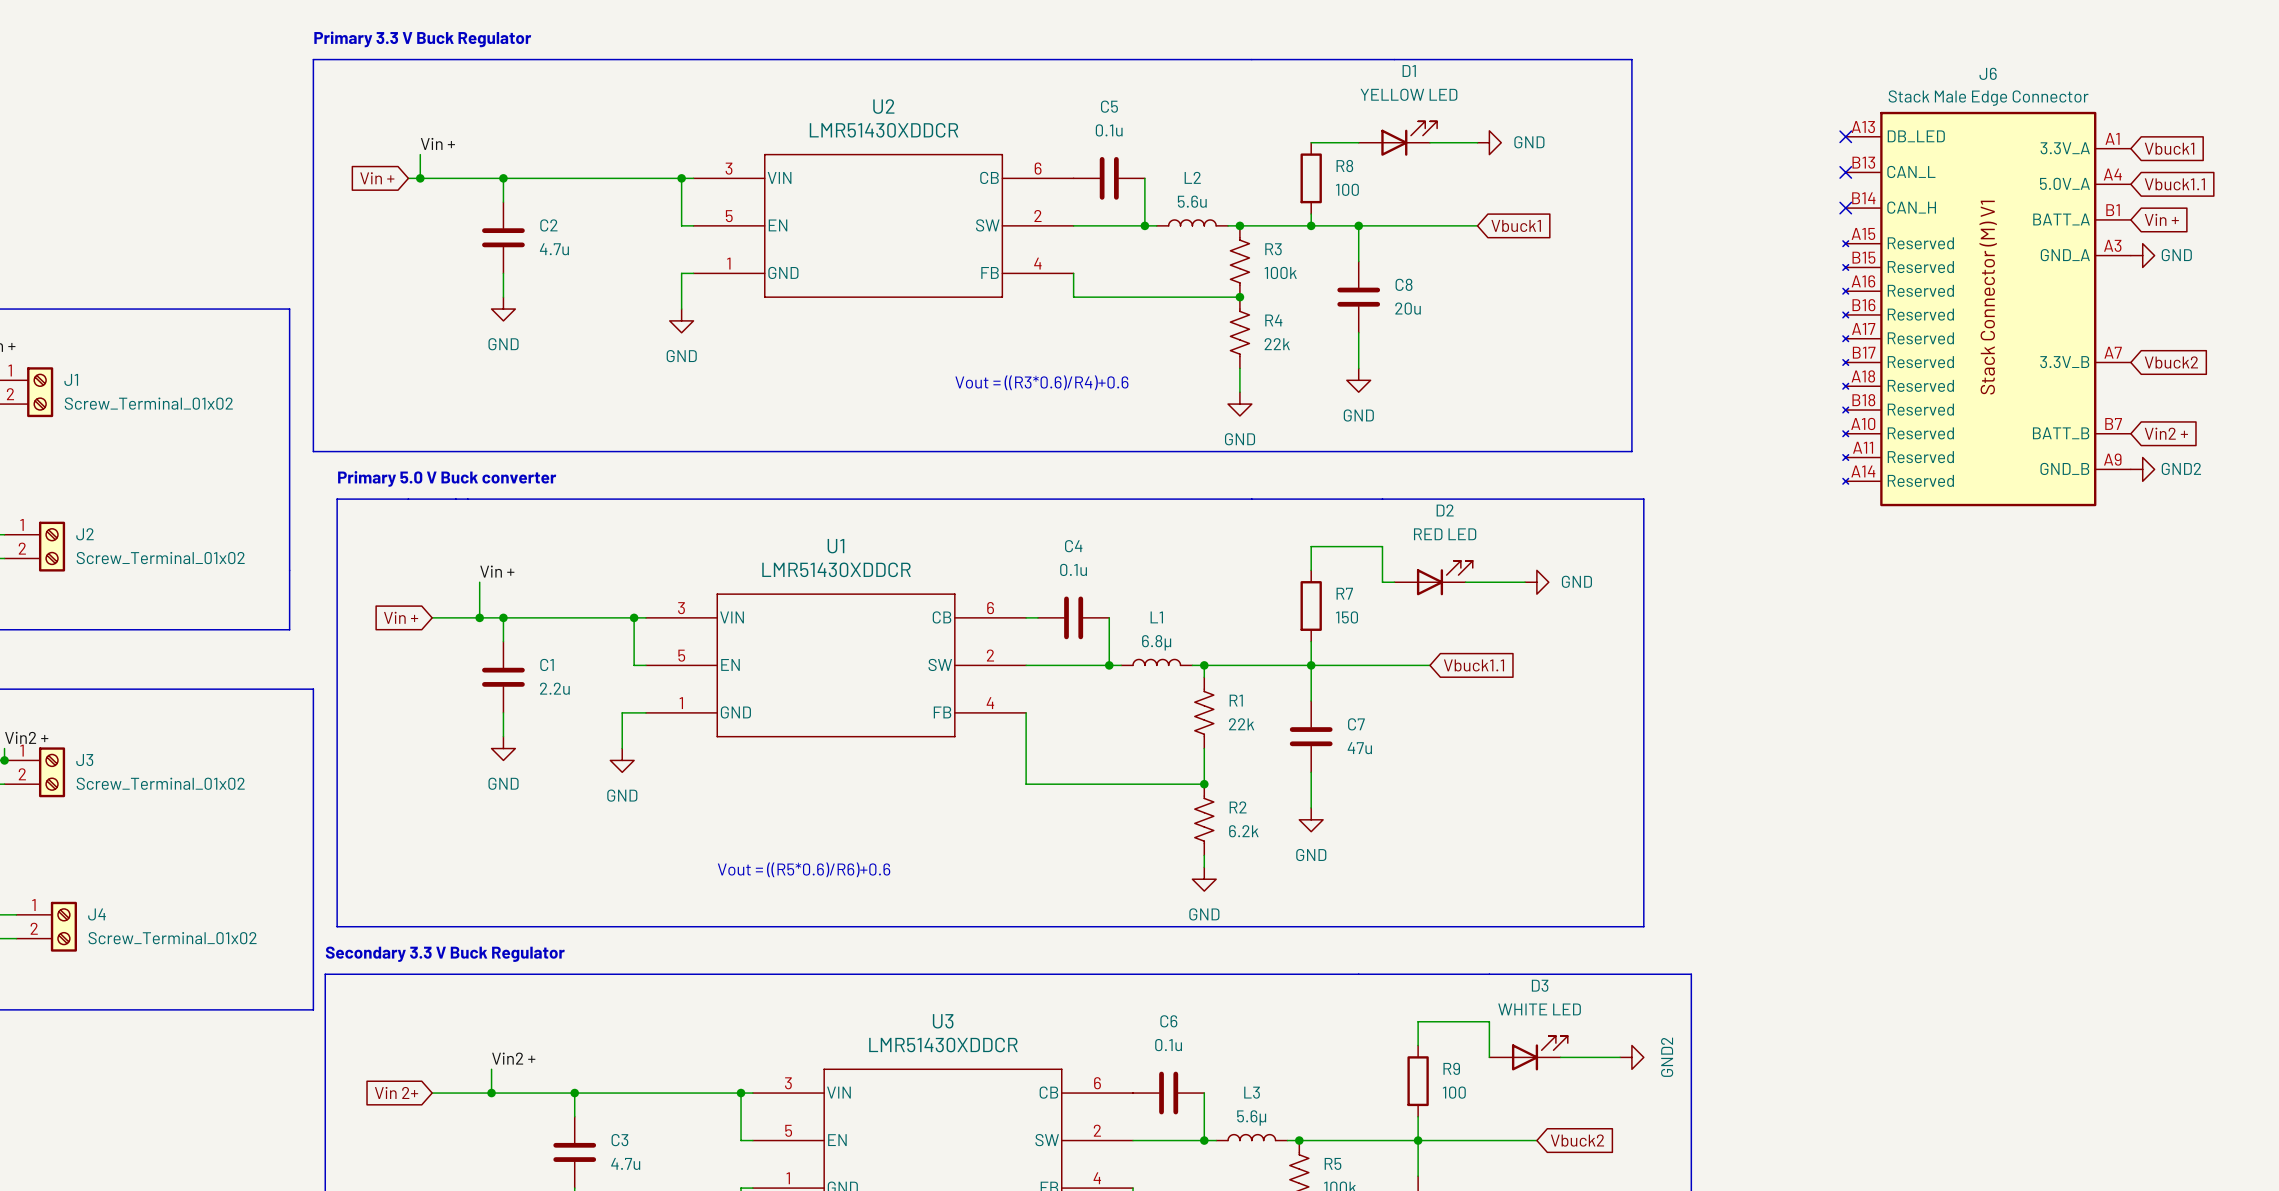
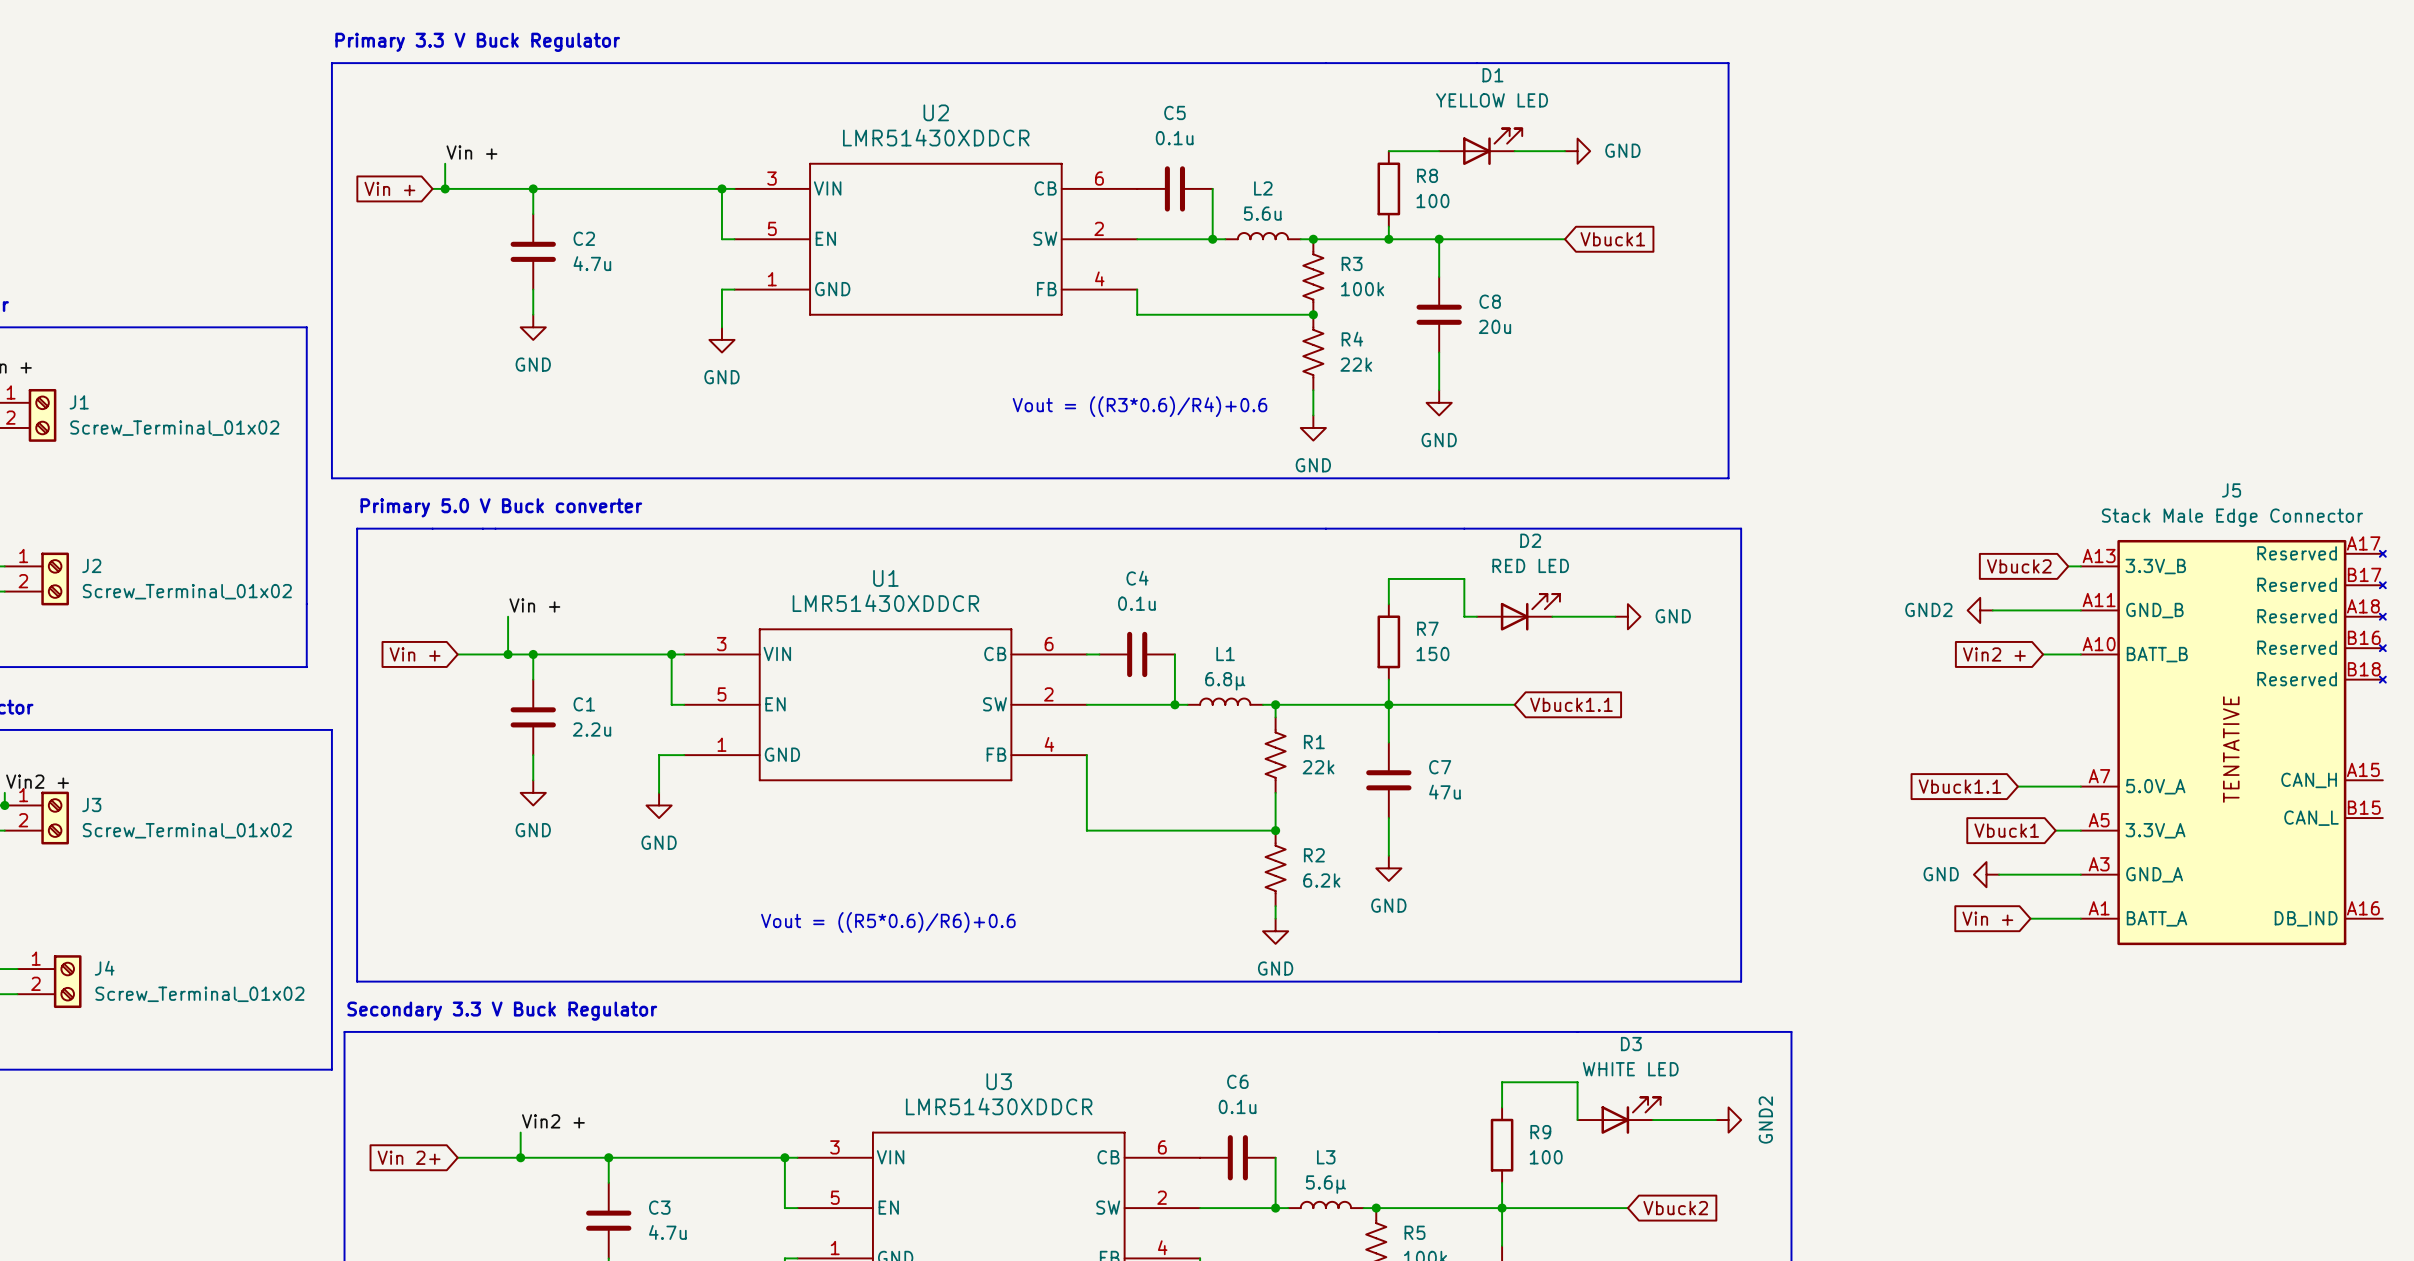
no-connect mark: (1845, 136) -> none
global label: Vbuck1 (2169, 148) -> none
no-connect mark: (1845, 172) -> none
global label: Vbuck1.1 (2174, 184) -> none
no-connect mark: (1845, 208) -> none
global label: Vin + (2161, 219) -> none
power symbol: GND (2142, 255) -> none
J6: Stack Male Edge Connector (1986, 309) -> none
global label: Vbuck2 (2171, 362) -> none
global label: Vin2 + (2166, 433) -> none
power symbol: GND2 (2142, 469) -> none
global label: none -> Vbuck2 (2019, 566)
wire: none -> (2068, 566) (2080, 566)
power symbol: none -> GND2 (1980, 610)
wire: none -> (1992, 610) (2080, 610)
global label: none -> Vin2 + (1994, 654)
wire: none -> (2043, 654) (2080, 654)
J5: none -> Stack Male Edge Connector (2233, 742)
global label: none -> Vbuck1.1 (1959, 786)
wire: none -> (2017, 786) (2080, 786)
global label: none -> Vbuck1 (2006, 830)
wire: none -> (2055, 830) (2080, 830)
power symbol: none -> GND (1986, 874)
wire: none -> (1999, 874) (2080, 874)
global label: none -> Vin + (1987, 918)
wire: none -> (2030, 918) (2080, 918)

